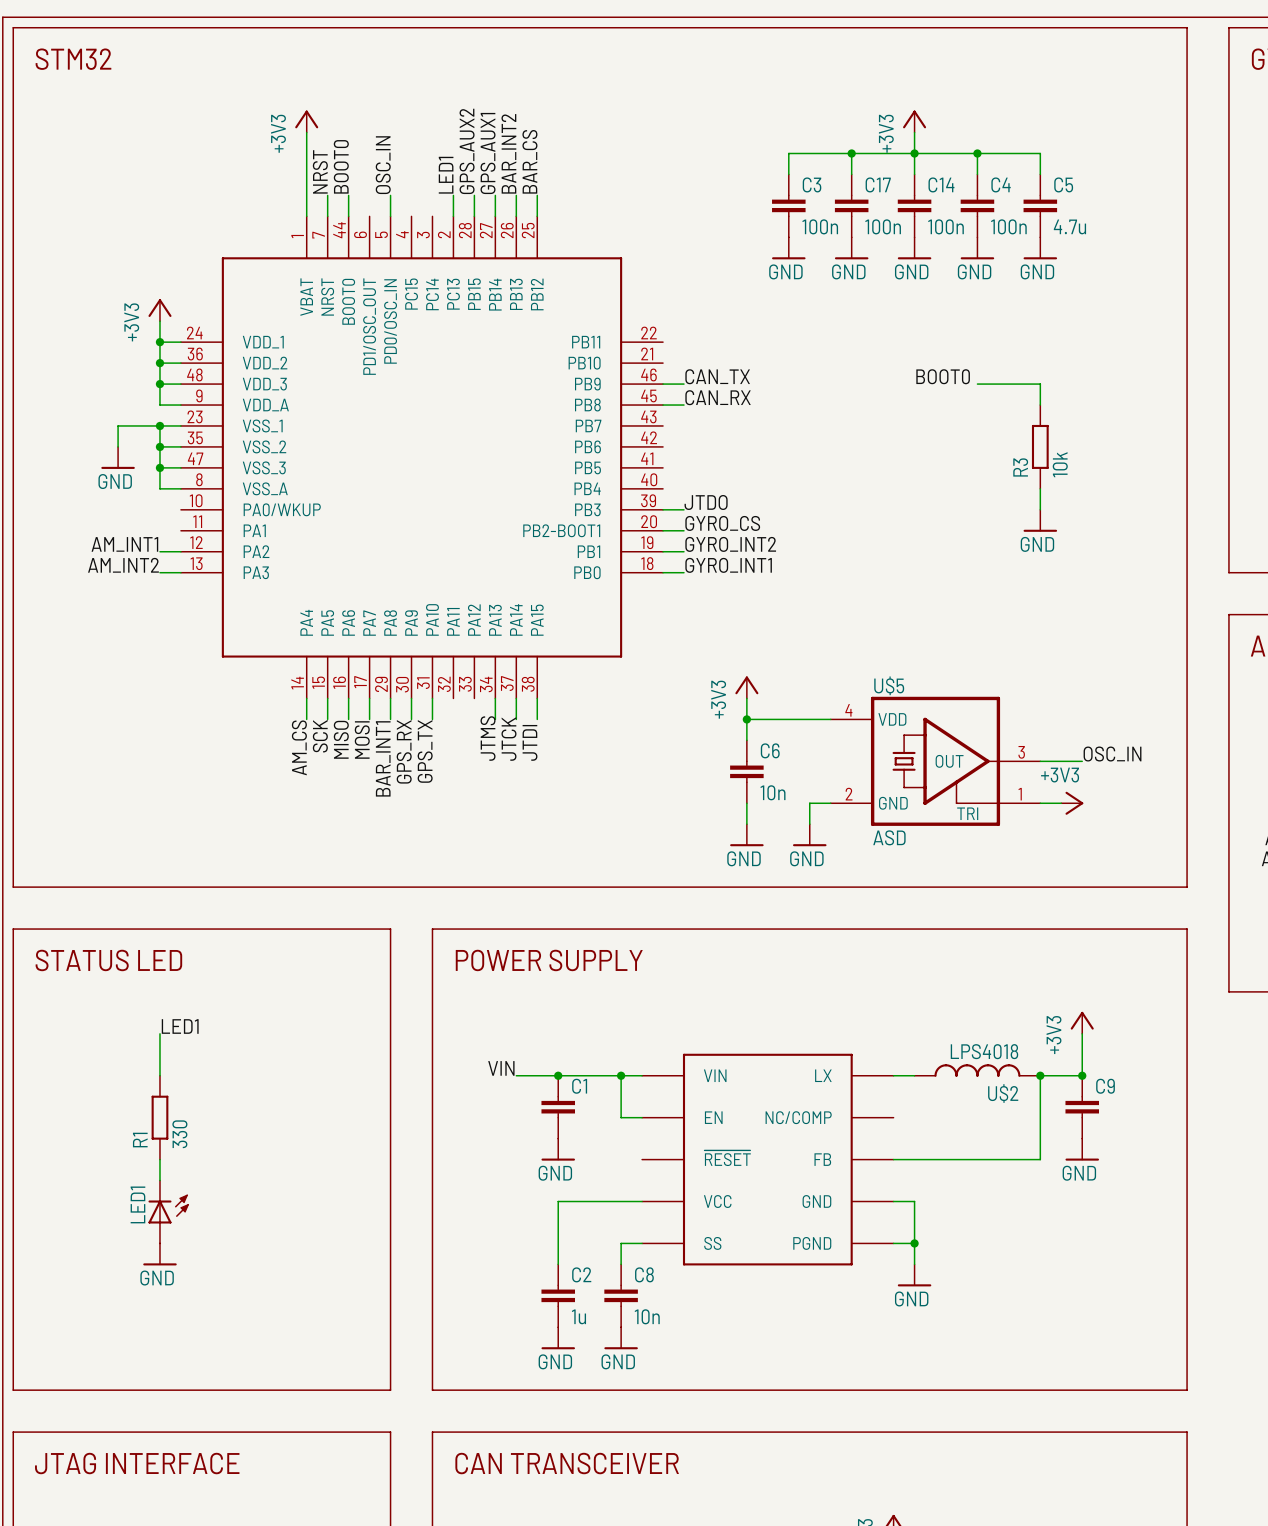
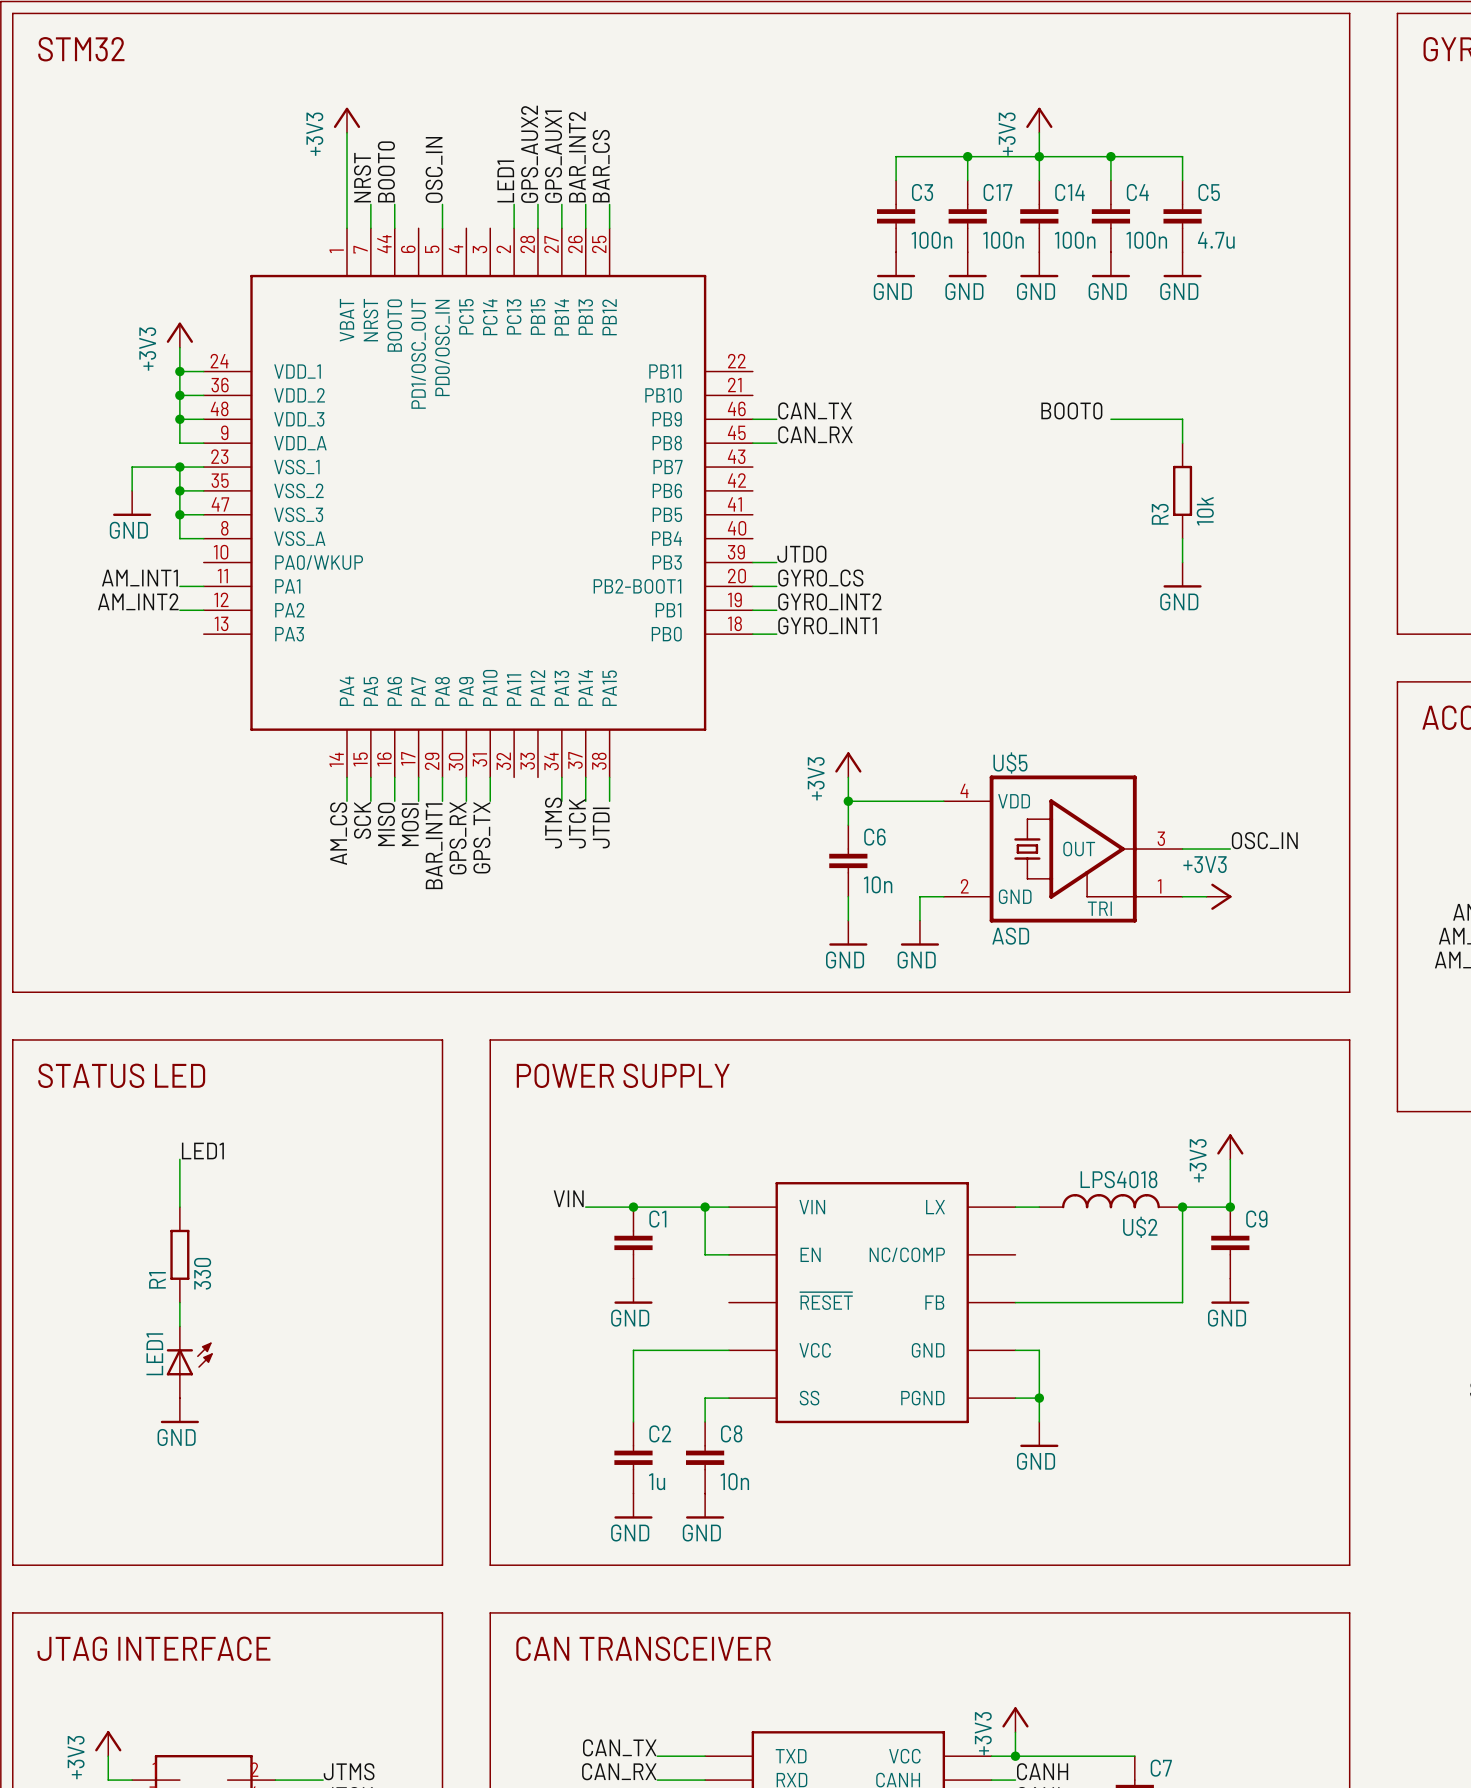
label: none -> AM_INT1 (139, 578)
label: AM_INT1 (124, 544) -> AM_INT2 (138, 601)
label: AM_INT2 (123, 565) -> none
wire: (159, 572) (180, 572) -> (179, 586) (203, 586)

